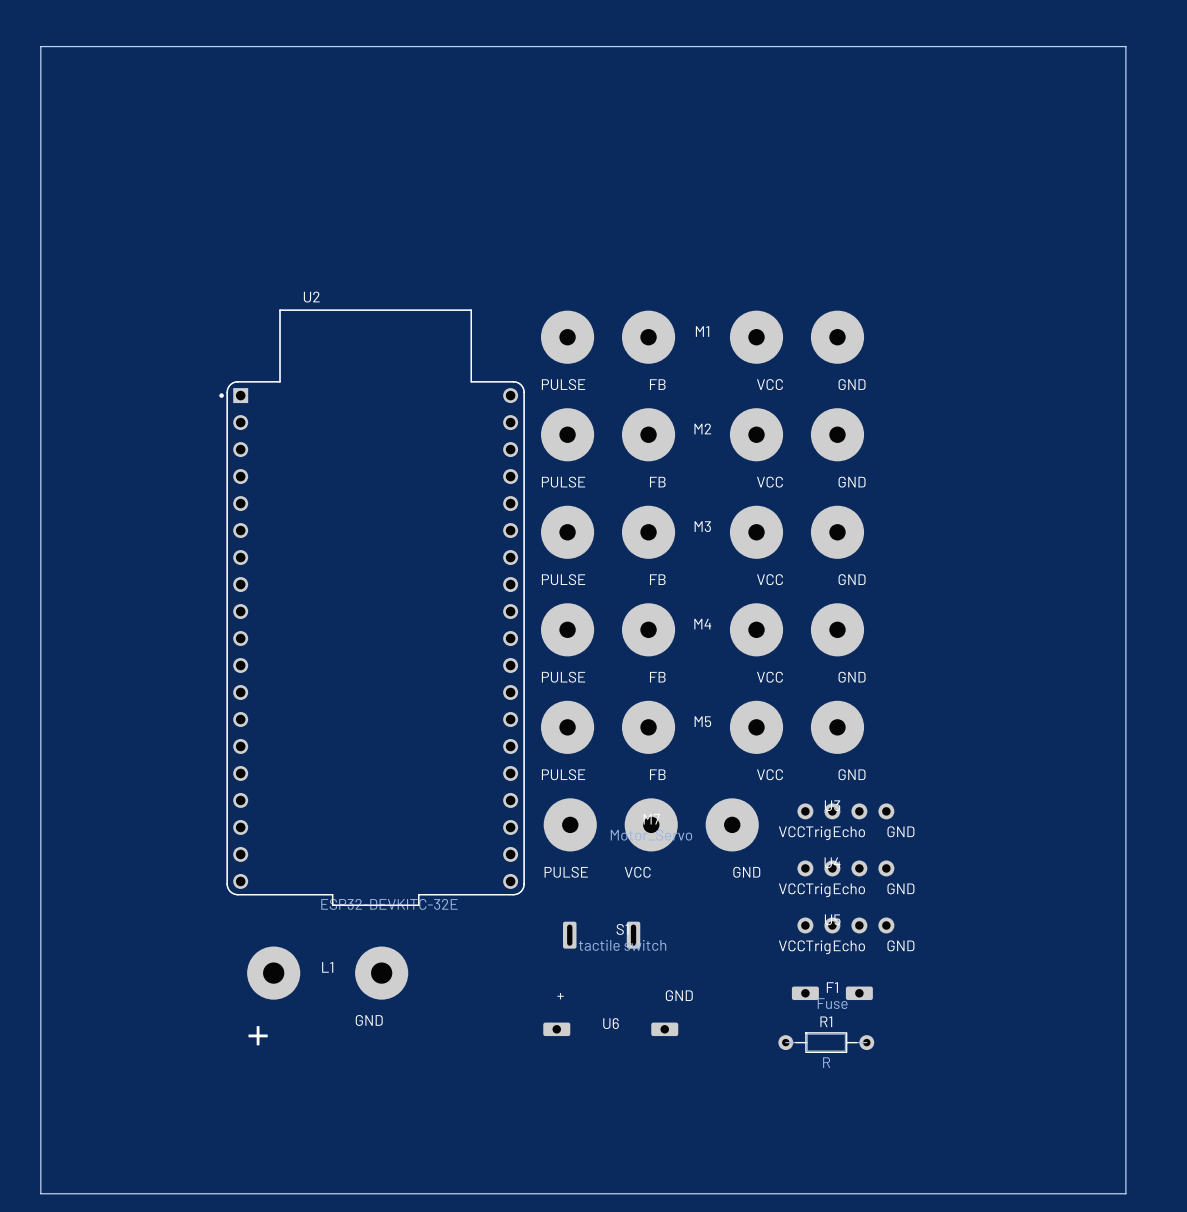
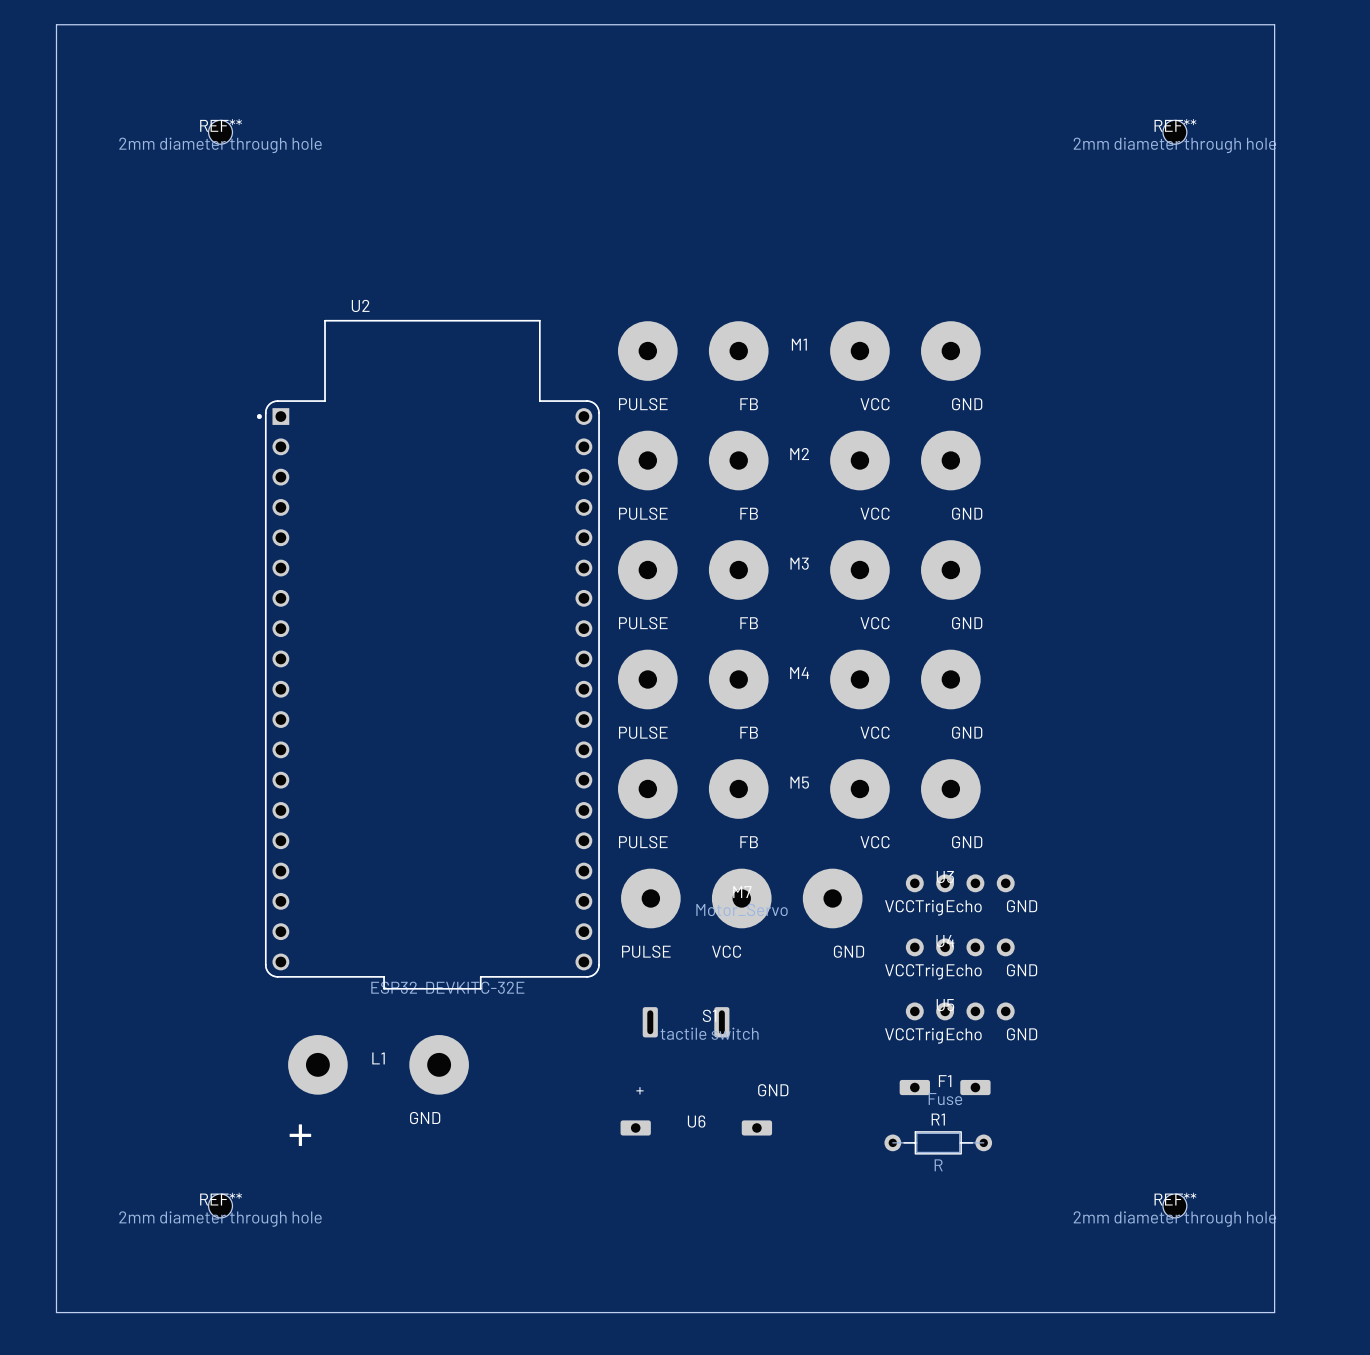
REF**: none -> 2mm diameter through hole (220, 132)
REF**: none -> 2mm diameter through hole (1174, 132)
REF**: none -> 2mm diameter through hole (220, 1205)
REF**: none -> 2mm diameter through hole (1174, 1205)

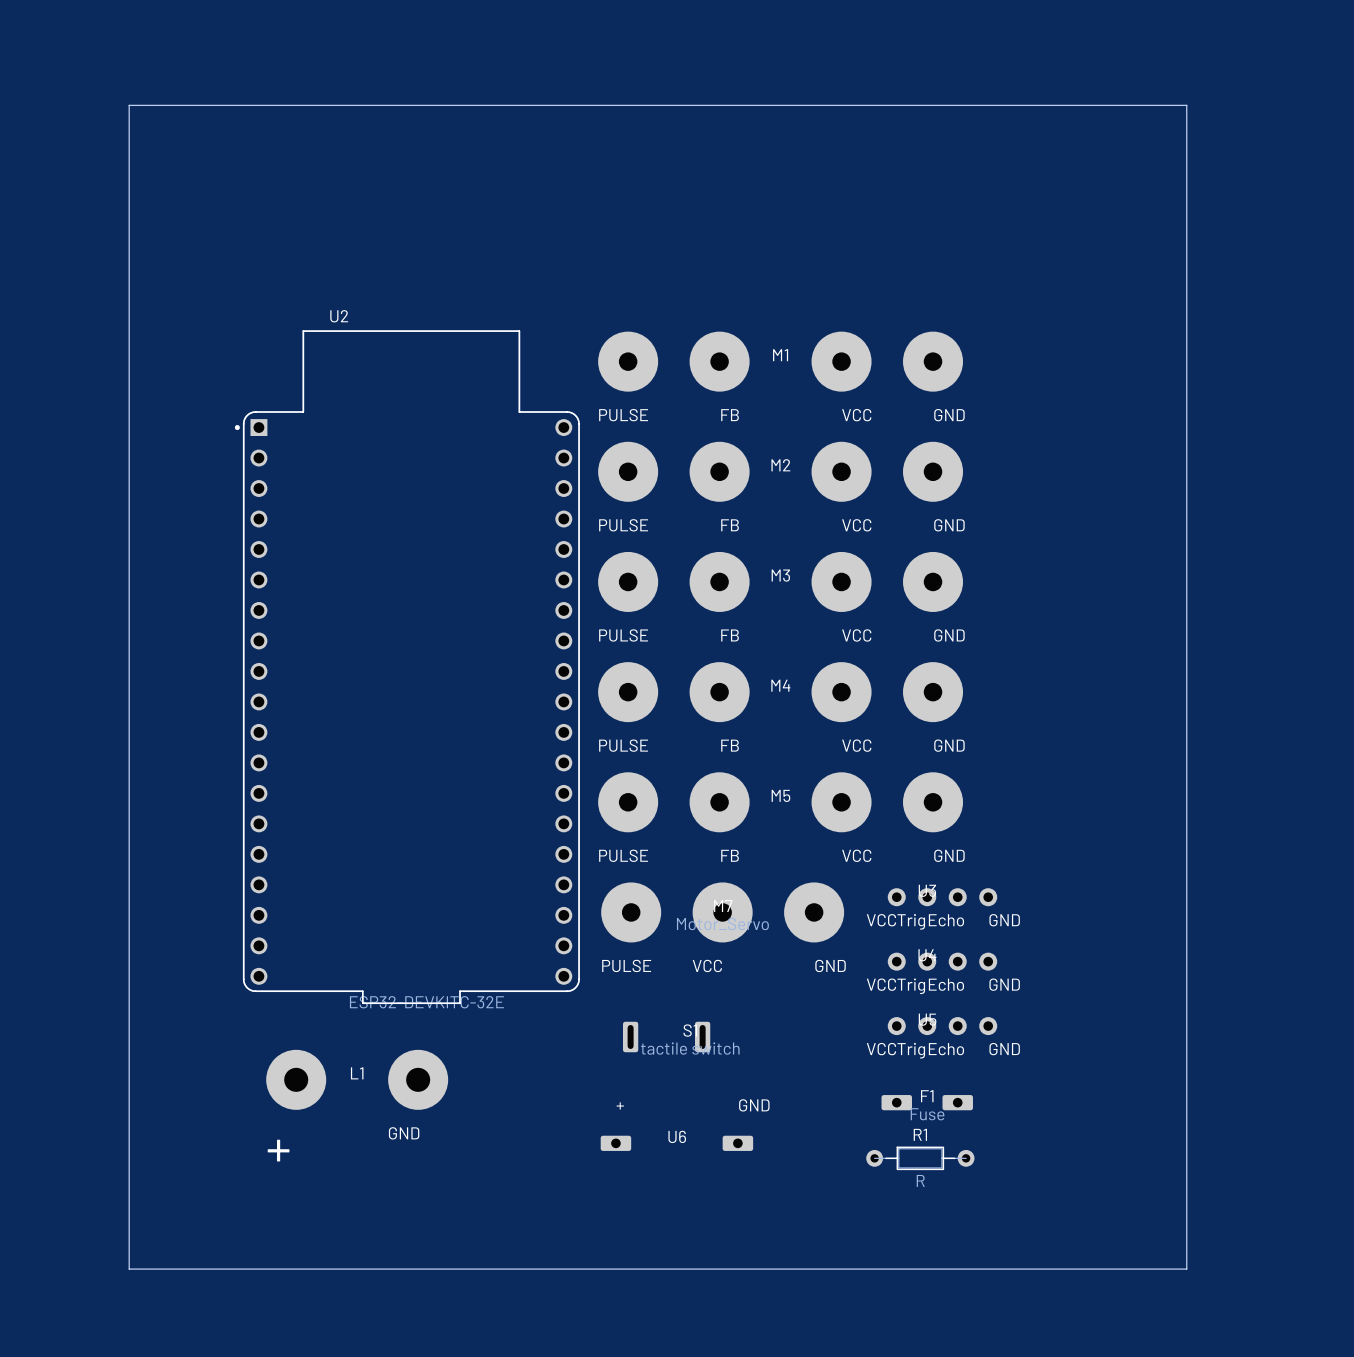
board edge: (56, 24) (1274, 24) (1274, 1312) (56, 1312) (56, 24) -> (129, 105) (129, 1269) (1186, 1269) (1186, 105) (129, 105)
REF**: 2mm diameter through hole (220, 132) -> none
REF**: 2mm diameter through hole (1174, 132) -> none
REF**: 2mm diameter through hole (220, 1205) -> none
REF**: 2mm diameter through hole (1174, 1205) -> none

